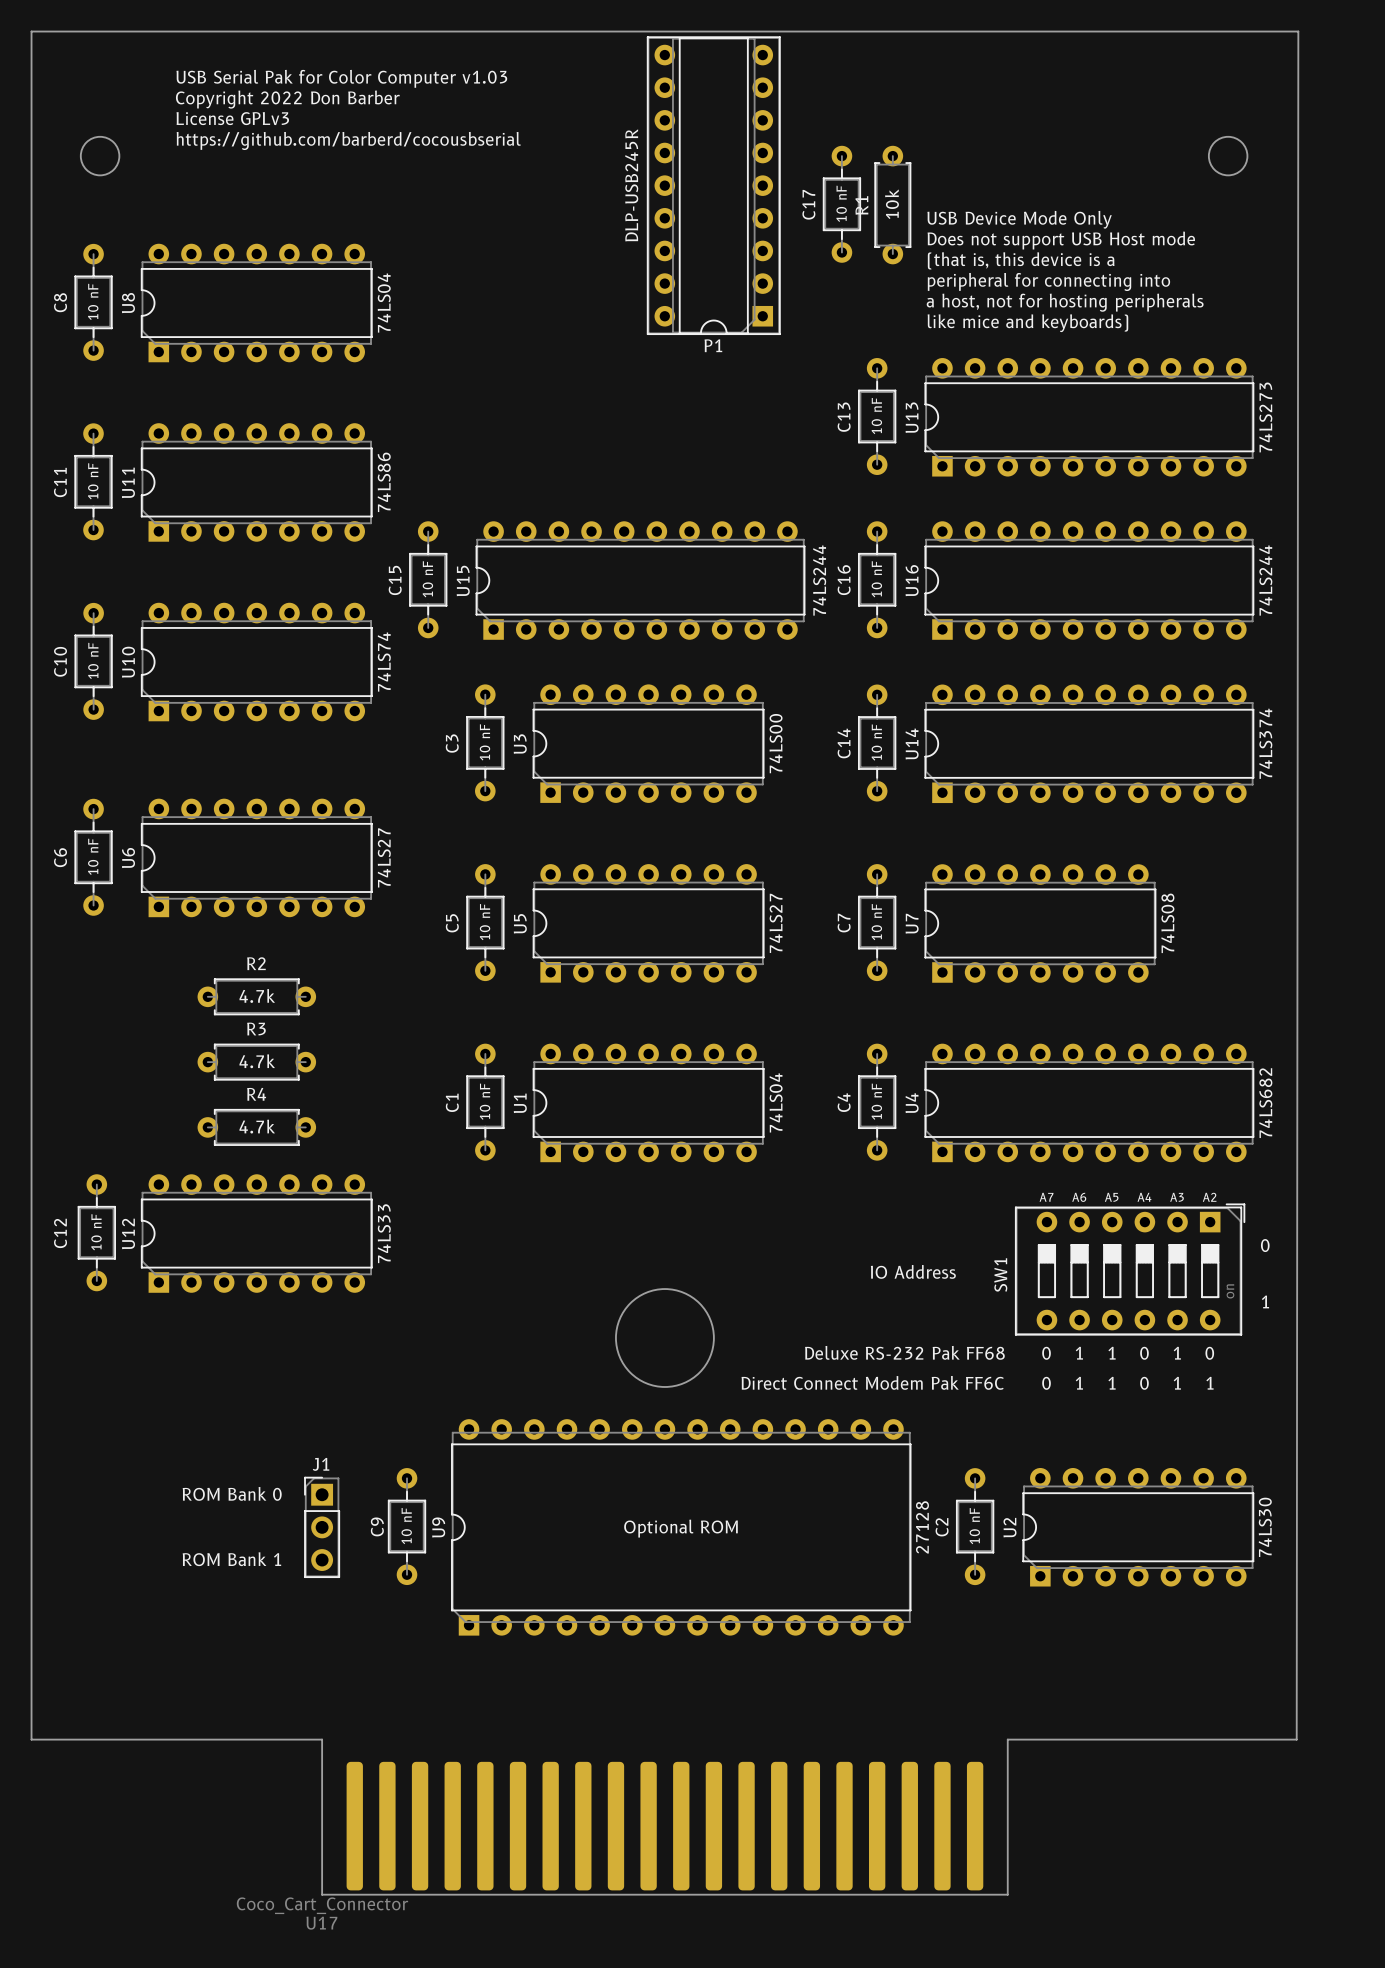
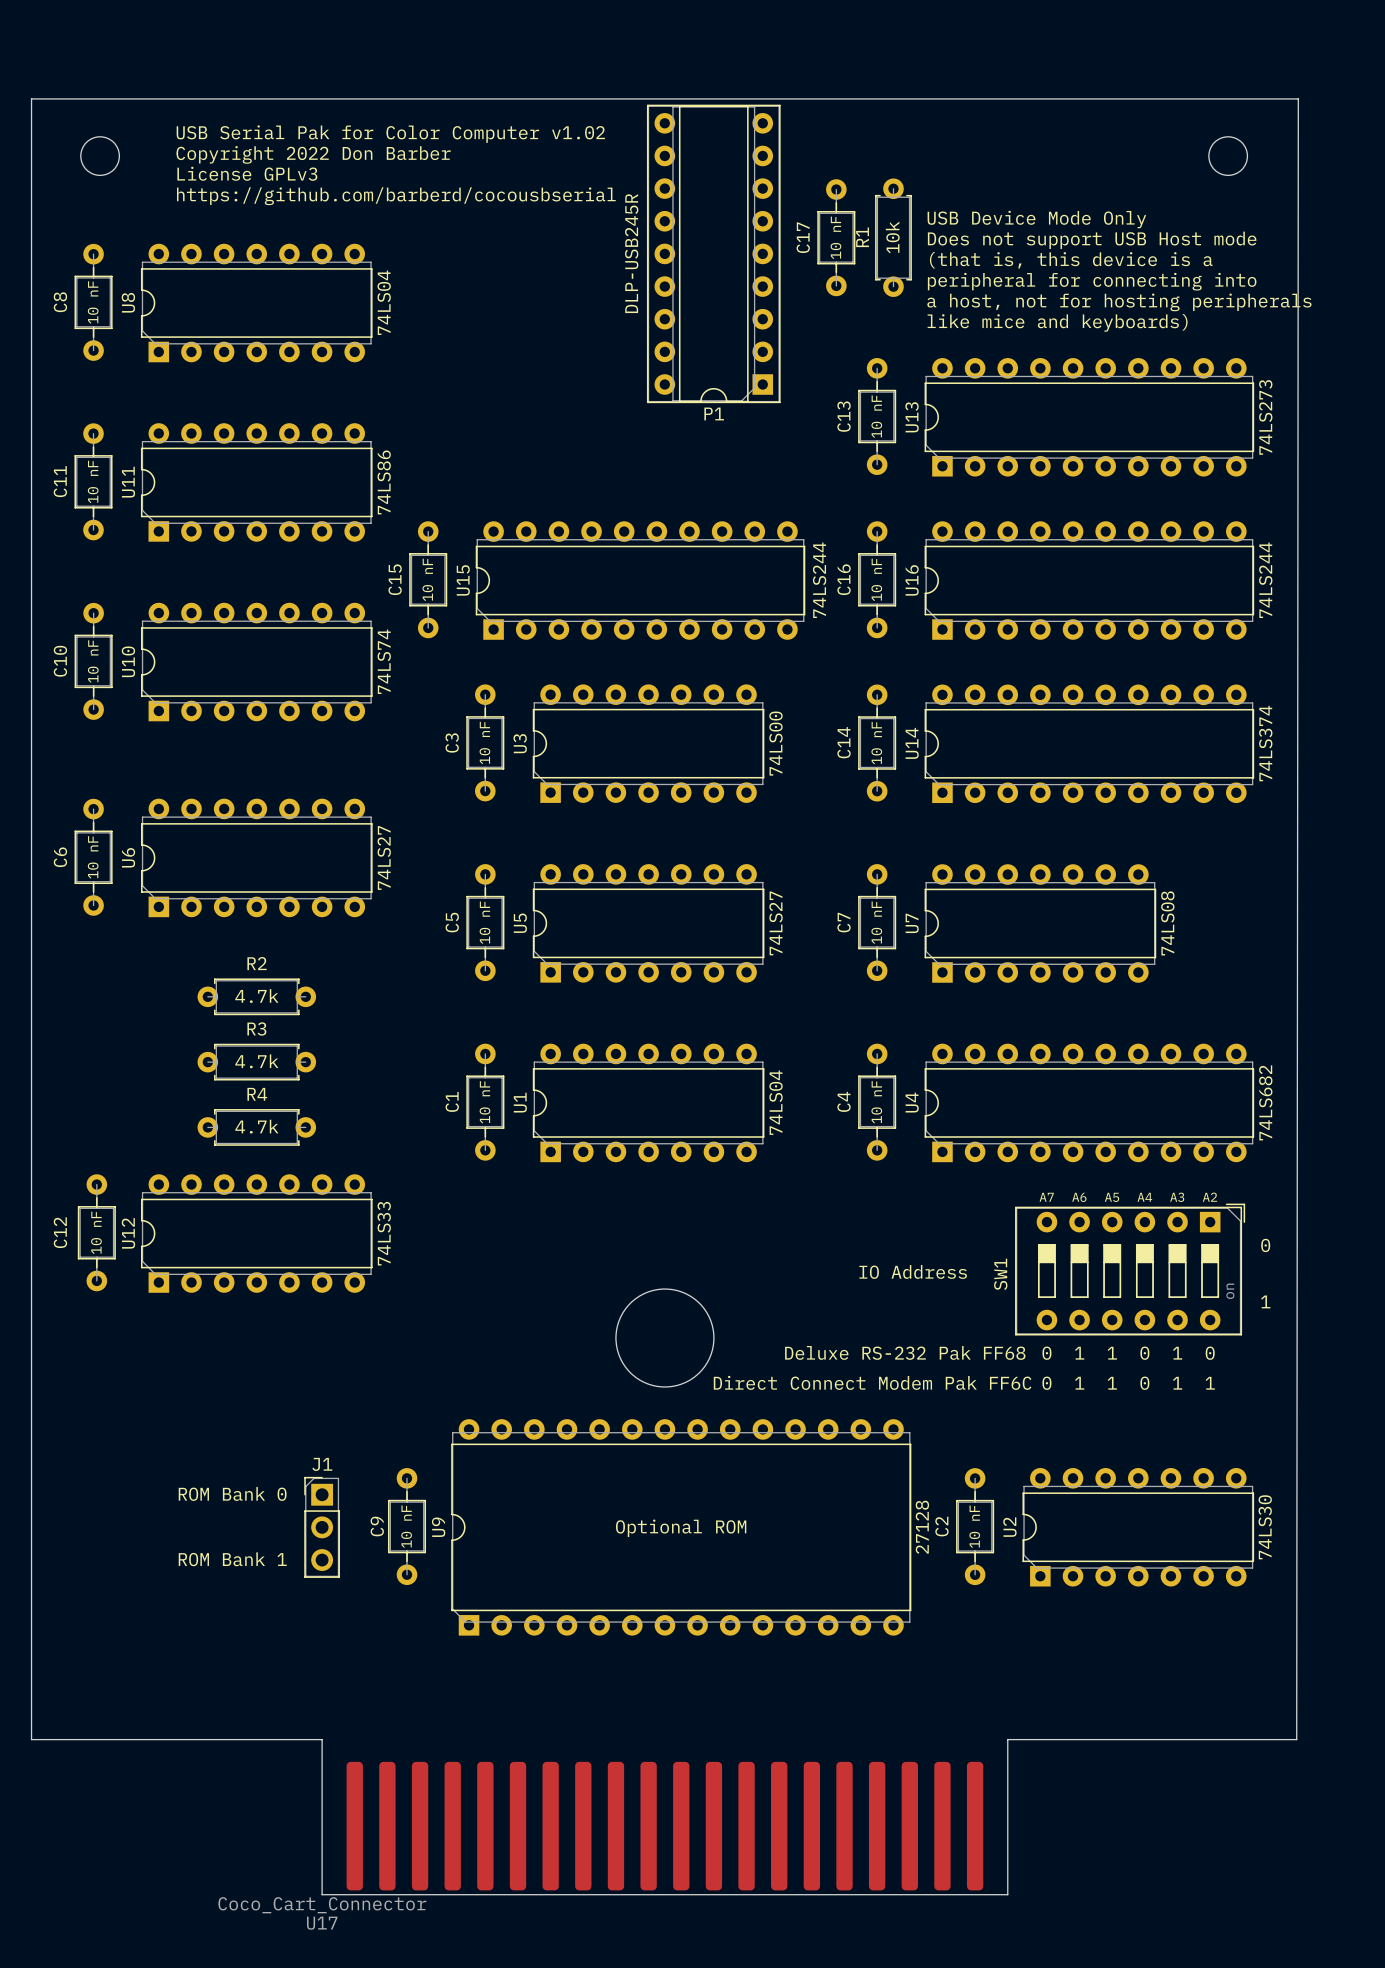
text: USB Serial Pak for Color Computer v1.03 (341, 78) -> none
board edge: (31, 98) (31, 31) (1298, 31) (1296, 1739) -> (31, 98) (1298, 98) (1296, 1739)
text position: Copyright 2022 Don Barber (287, 99) -> Copyright 2022 Don Barber (313, 154)
text position: License GPLv3 (232, 118) -> License GPLv3 (247, 173)
text: none -> USB Serial Pak for Color Computer v1.02 (390, 134)
text position: https://github.com/barberd/cocousbserial (348, 140) -> https://github.com/barberd/cocousbserial (396, 196)
P1 position: (713, 185) -> (713, 253)
C17 position: (841, 204) -> (836, 237)
R1 position: (892, 205) -> (893, 237)

